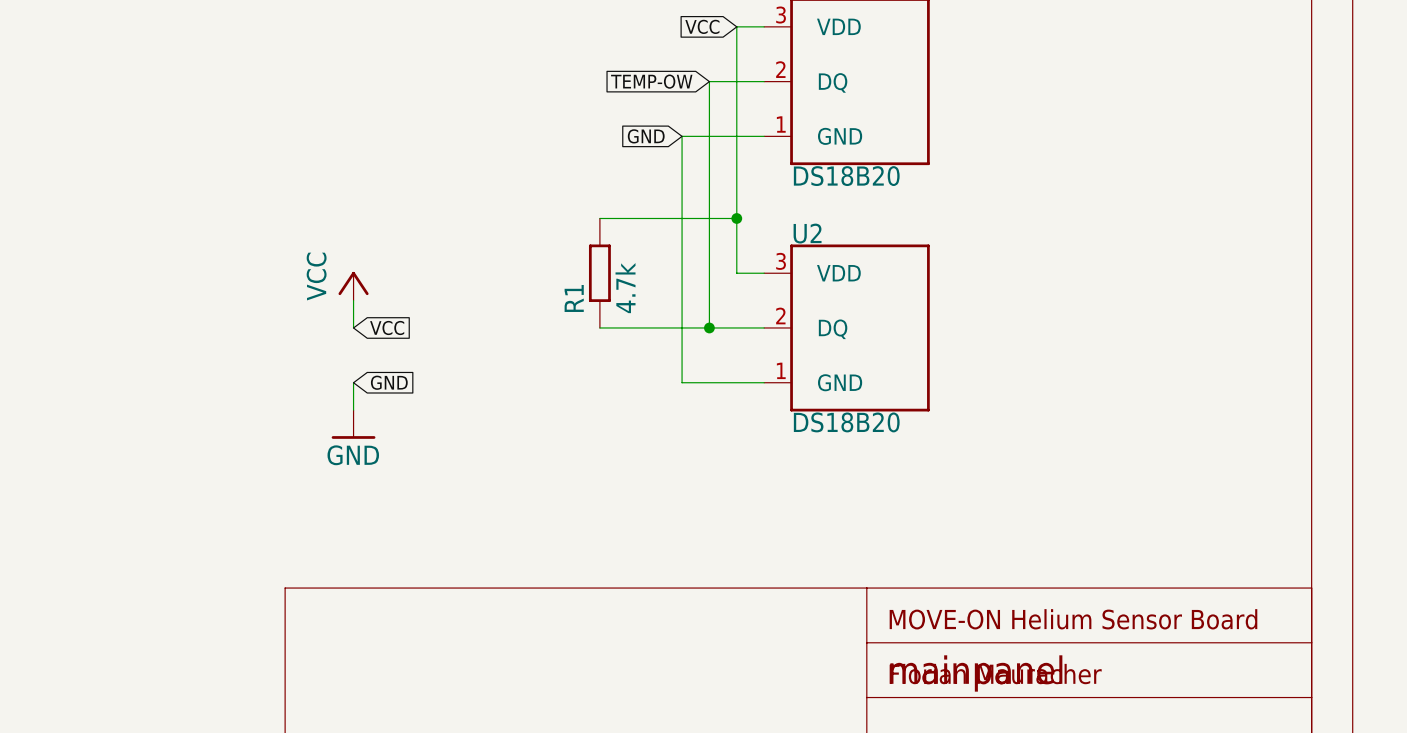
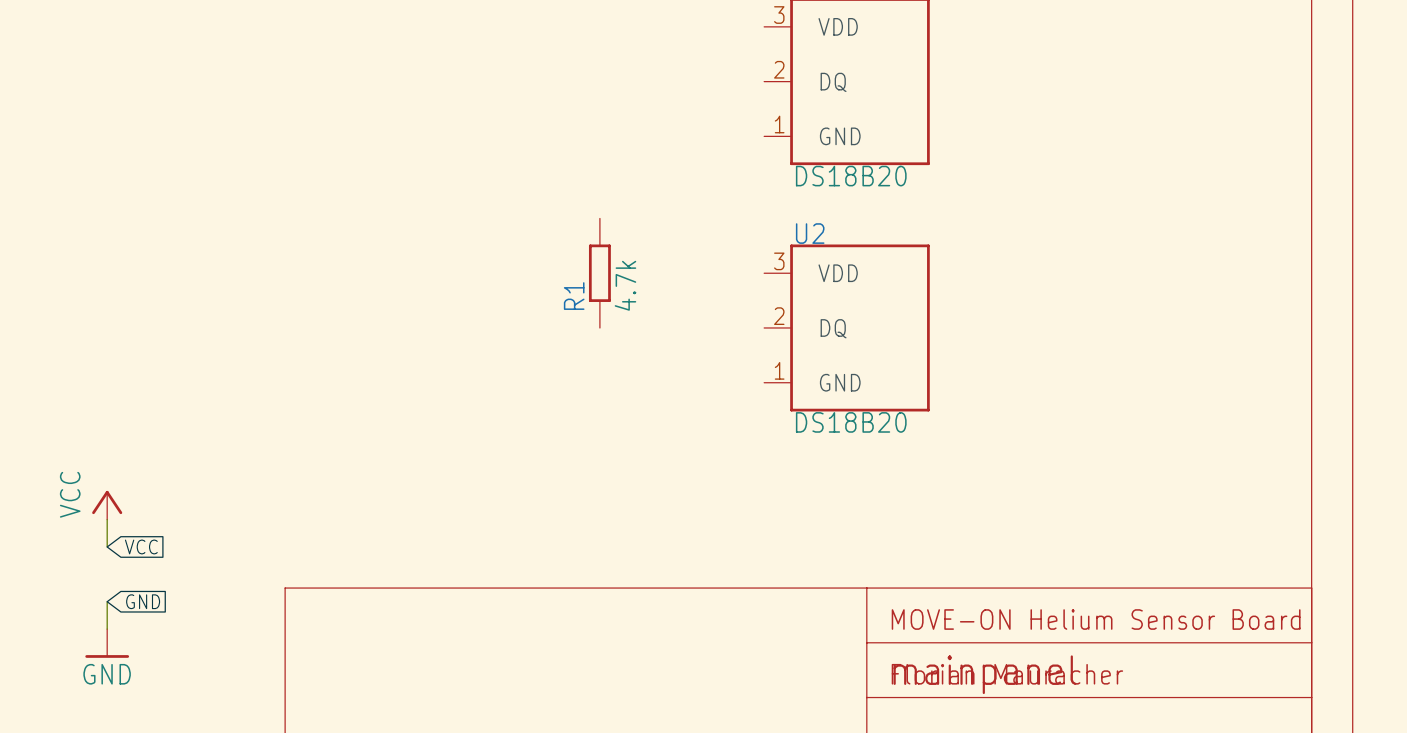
global label: VCC (702, 26) -> none
wire: (764, 26) (736, 26) (736, 273) (764, 273) -> none
global label: TEMP-OW (651, 81) -> none
wire: (764, 81) (709, 81) (709, 327) -> none
global label: GND (646, 136) -> none
wire: (764, 136) (682, 136) (682, 382) (764, 382) -> none
wire: (599, 218) (736, 218) -> none
junction: (736, 218) -> none
power symbol: VCC (353, 286) -> none
wire: (353, 300) (353, 327) -> none
global label: VCC (387, 327) -> none
wire: (599, 327) (764, 327) -> none
junction: (709, 327) -> none
wire: (353, 382) (353, 410) -> none
global label: GND (389, 382) -> none
power symbol: GND (353, 424) -> none
power symbol: none -> VCC (107, 505)
wire: none -> (107, 519) (107, 546)
global label: none -> VCC (141, 546)
wire: none -> (107, 601) (107, 629)
global label: none -> GND (143, 601)
power symbol: none -> GND (107, 643)

